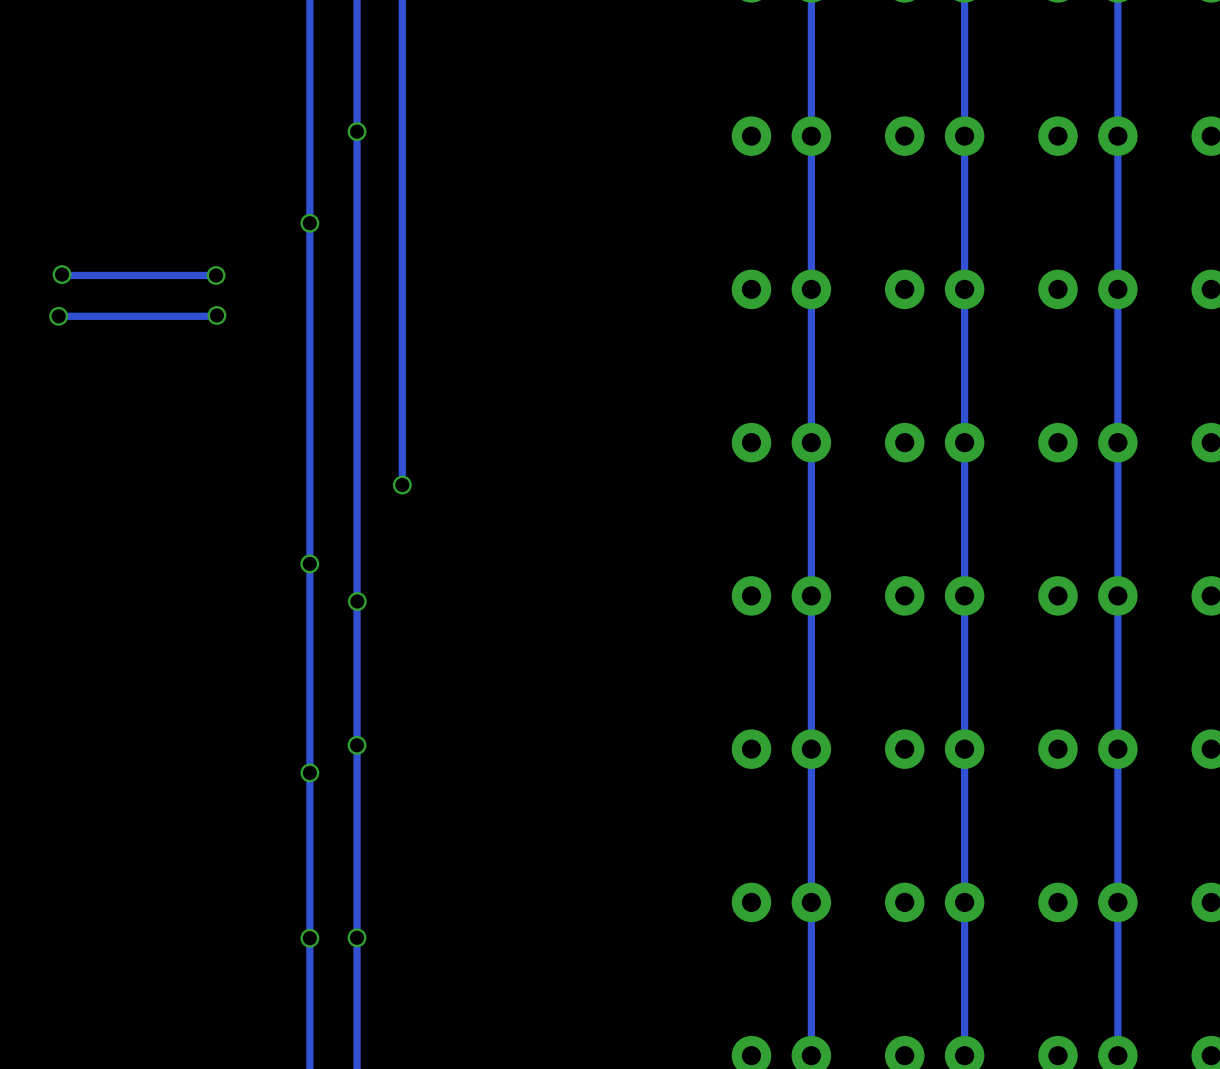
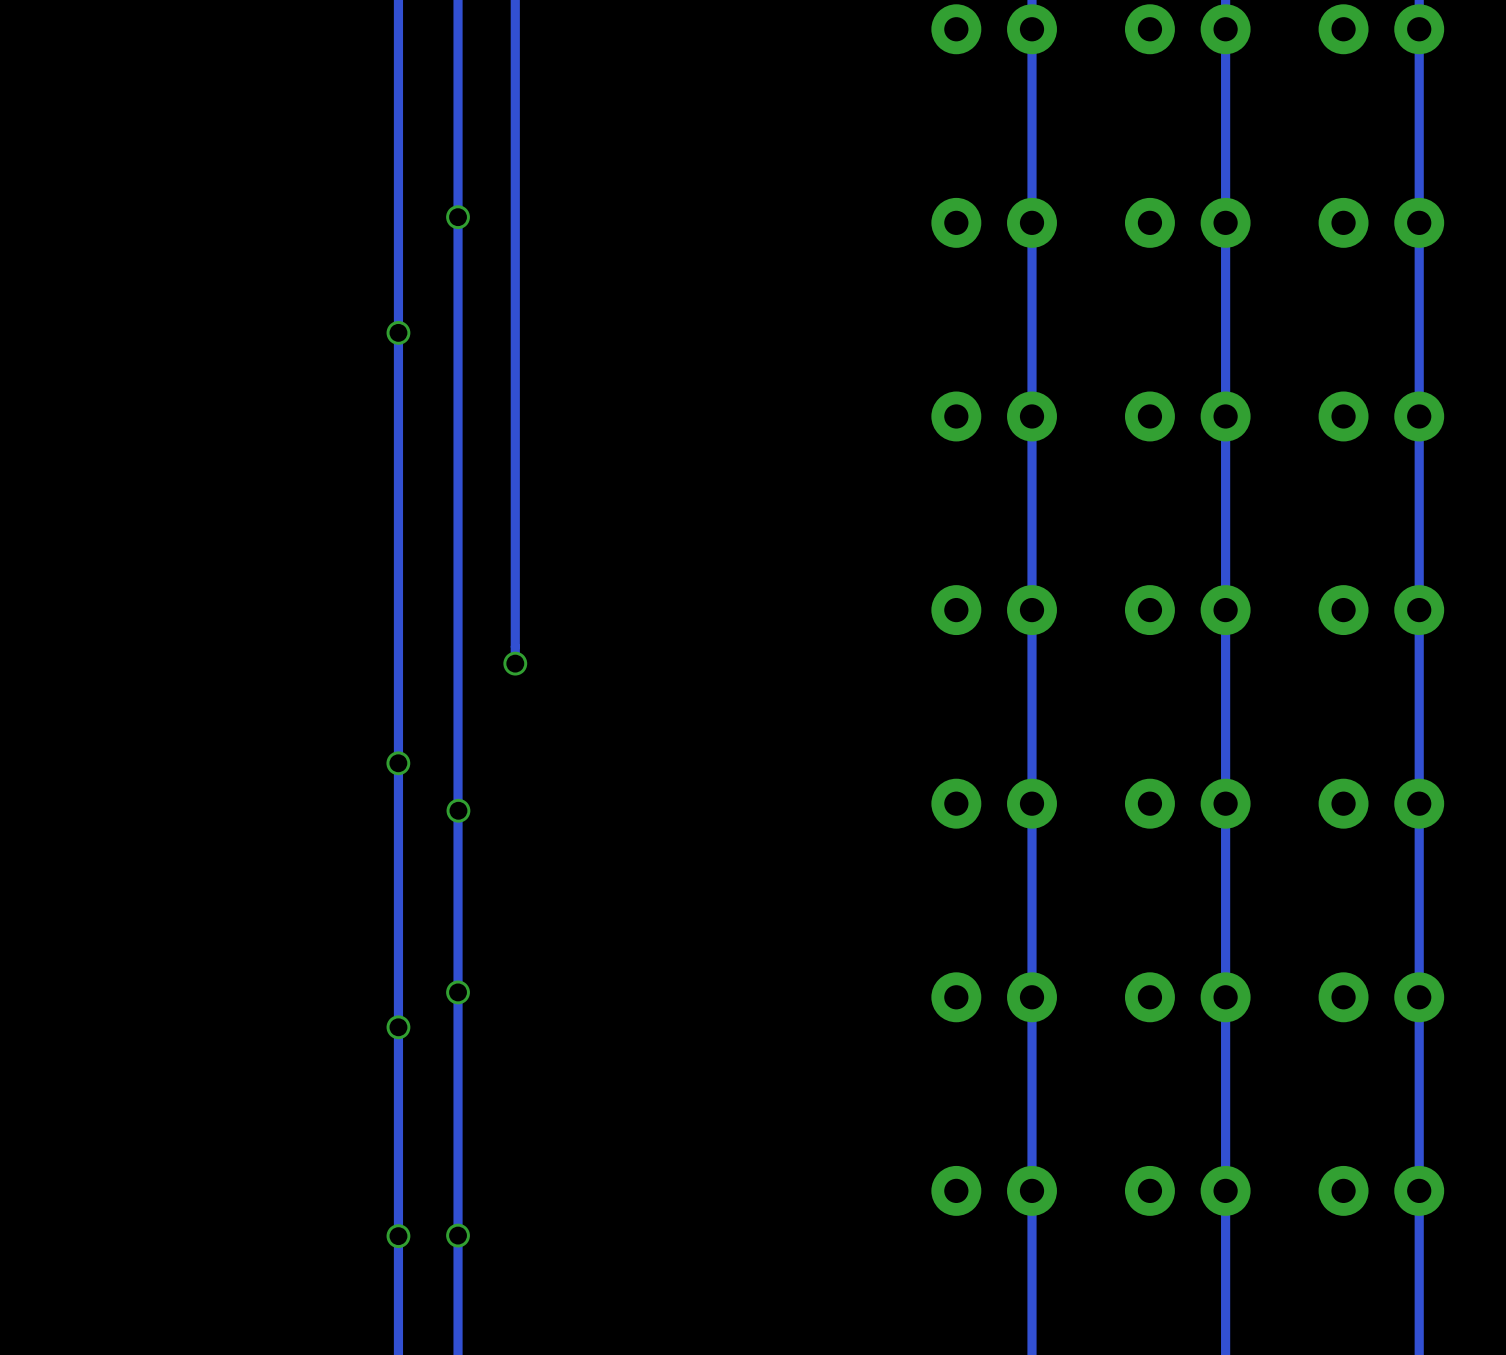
track: (62, 274) (216, 275) -> none
via: (62, 274) -> none
via: (216, 275) -> none
track: (216, 315) (58, 316) -> none
via: (216, 315) -> none
via: (58, 316) -> none

